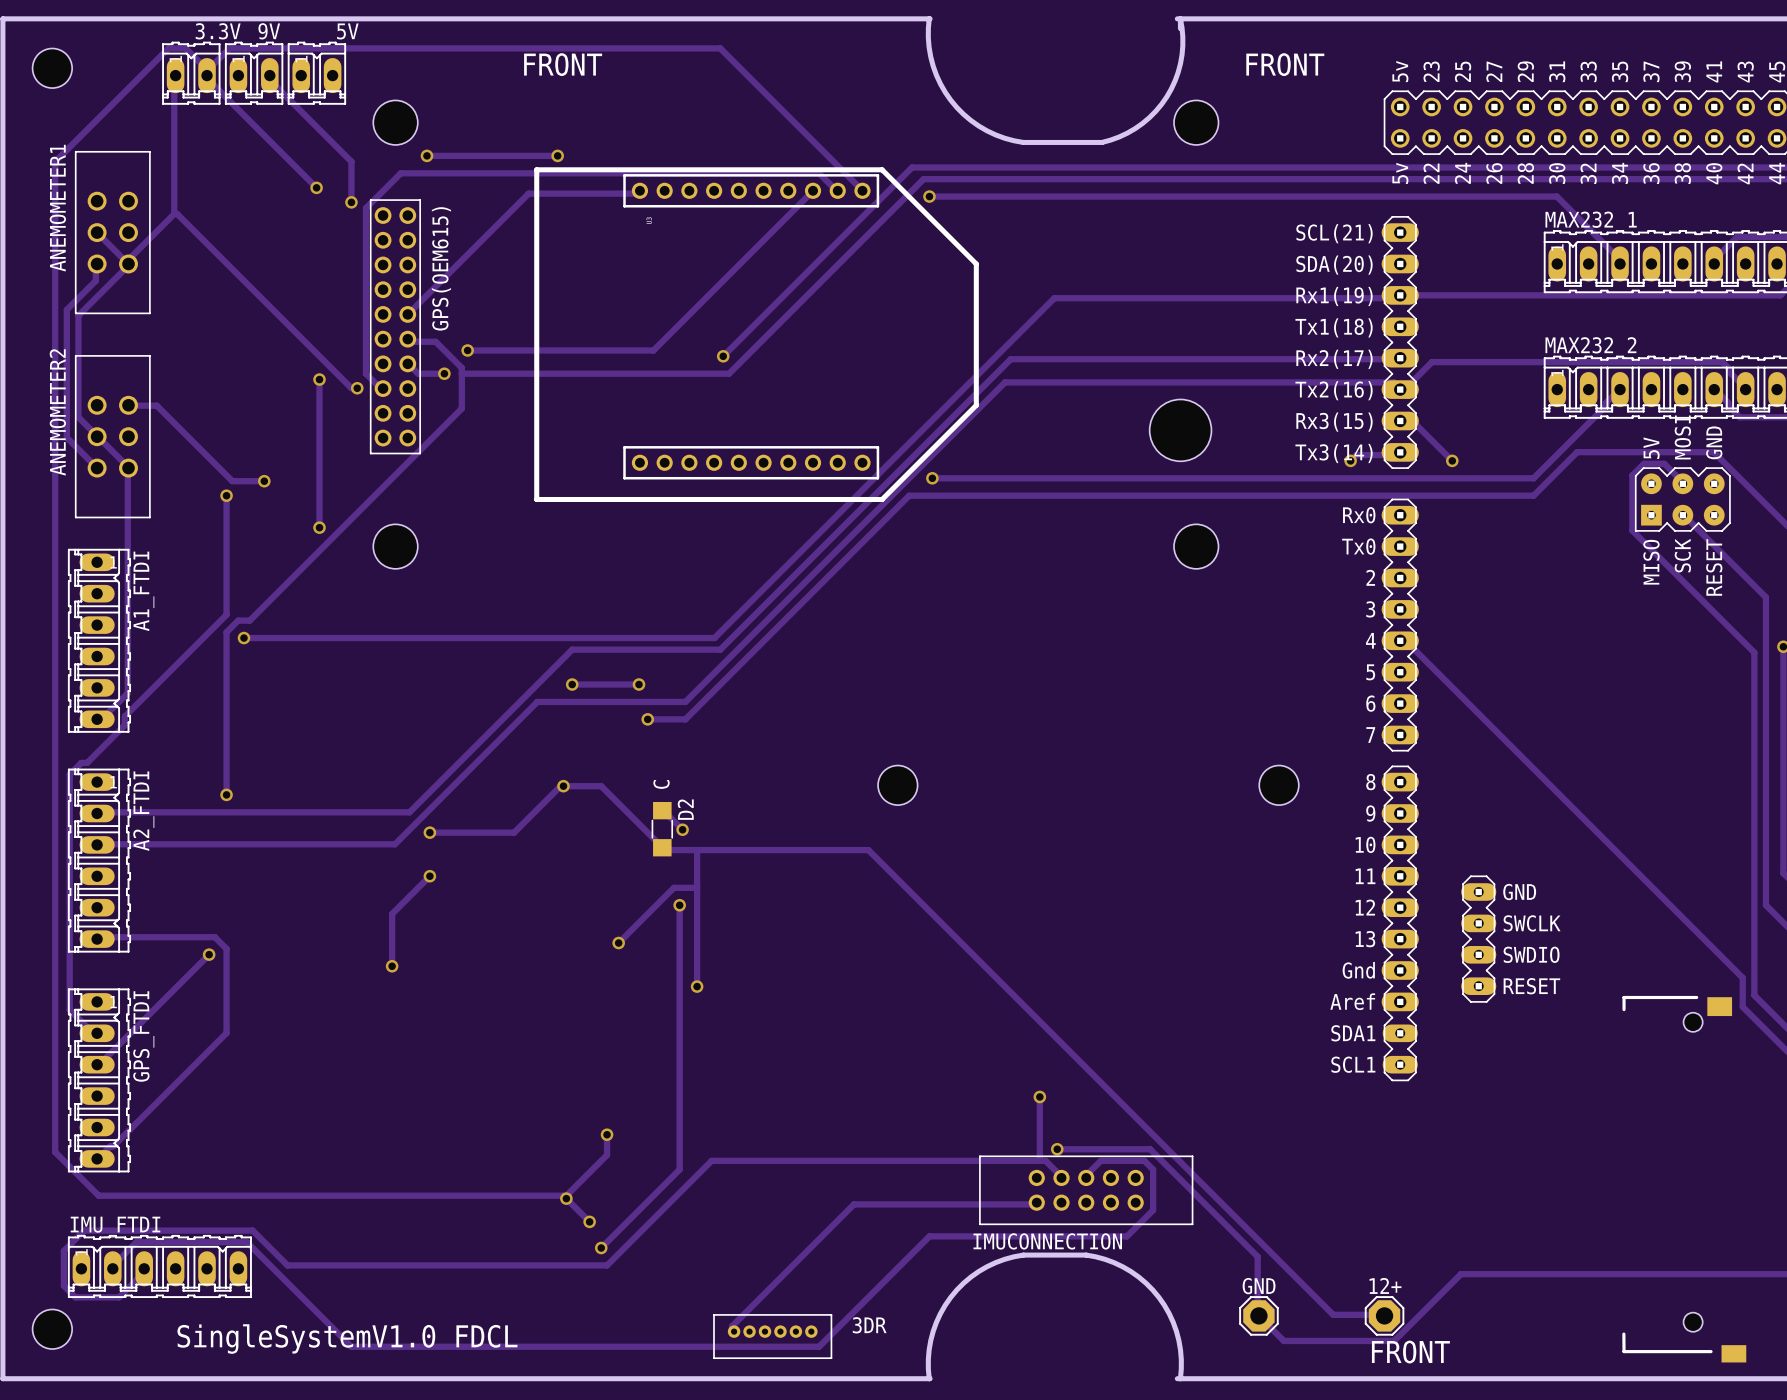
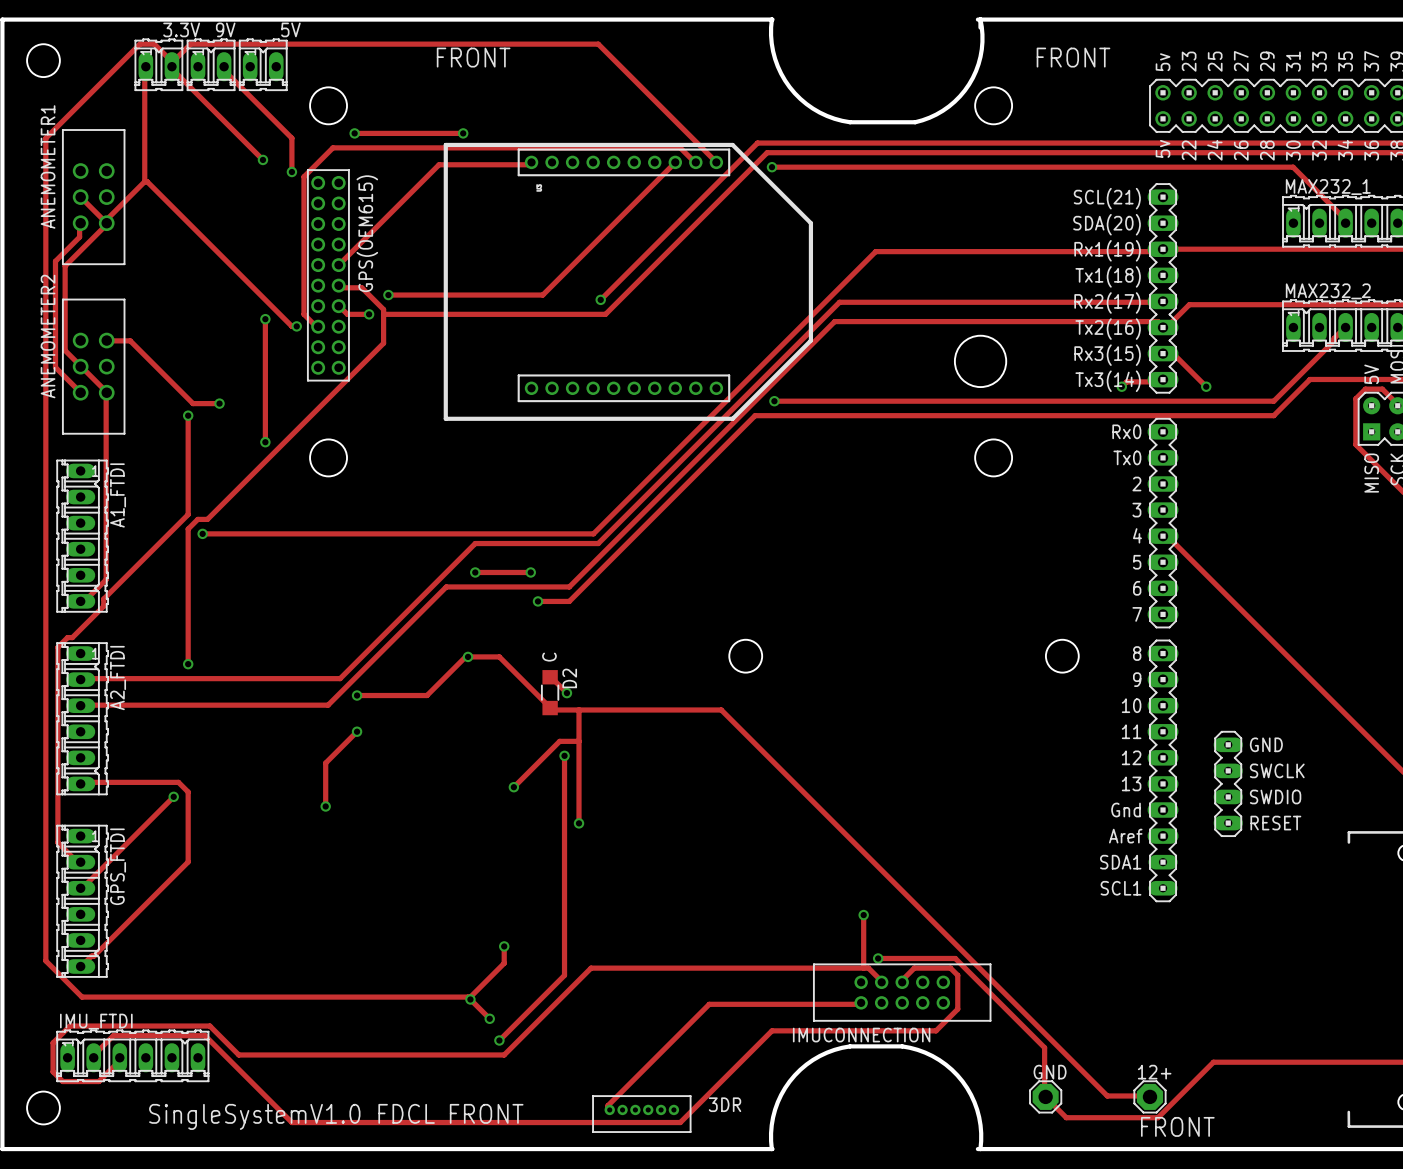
text: none -> FRONT (486, 1113)

